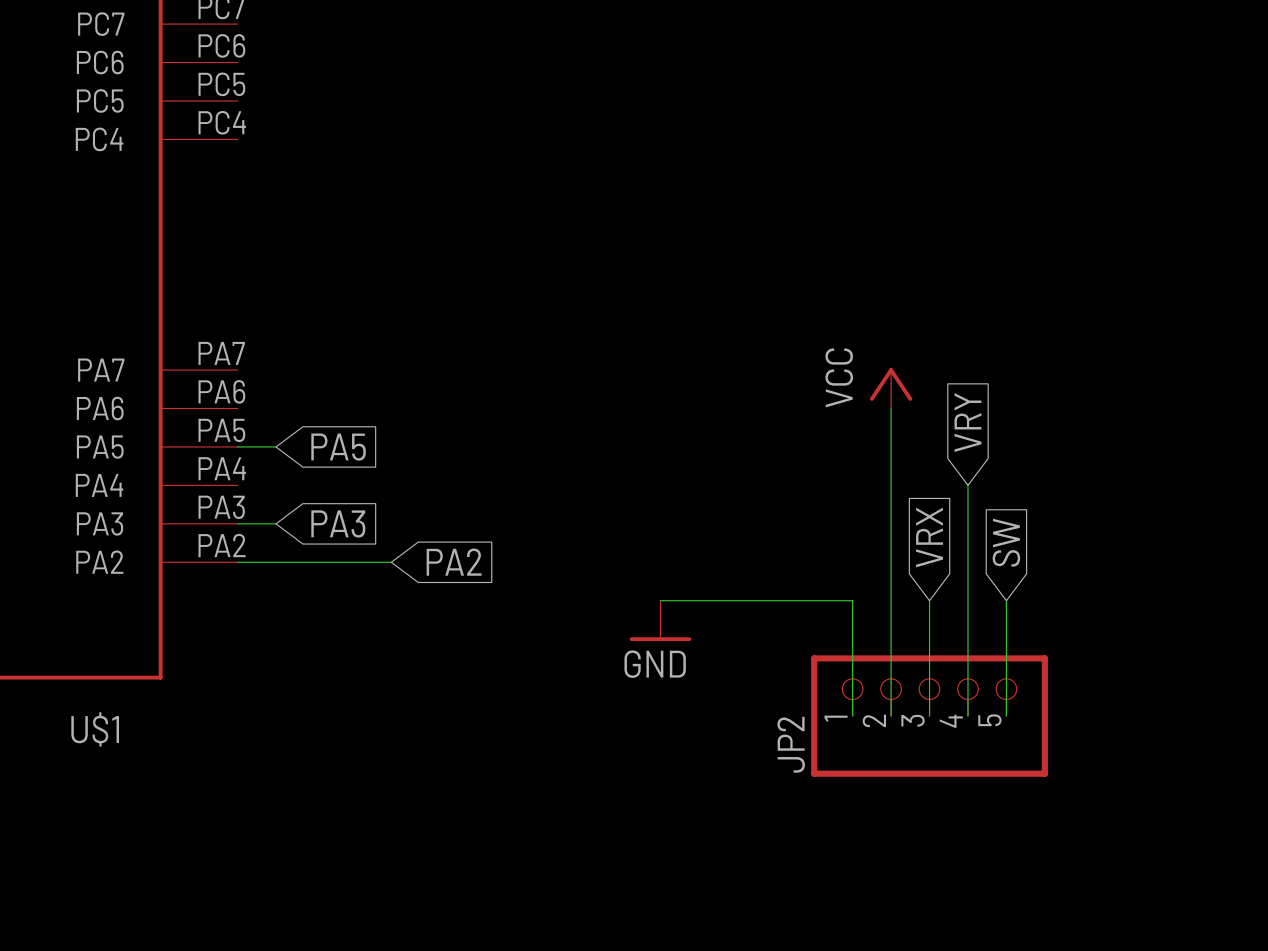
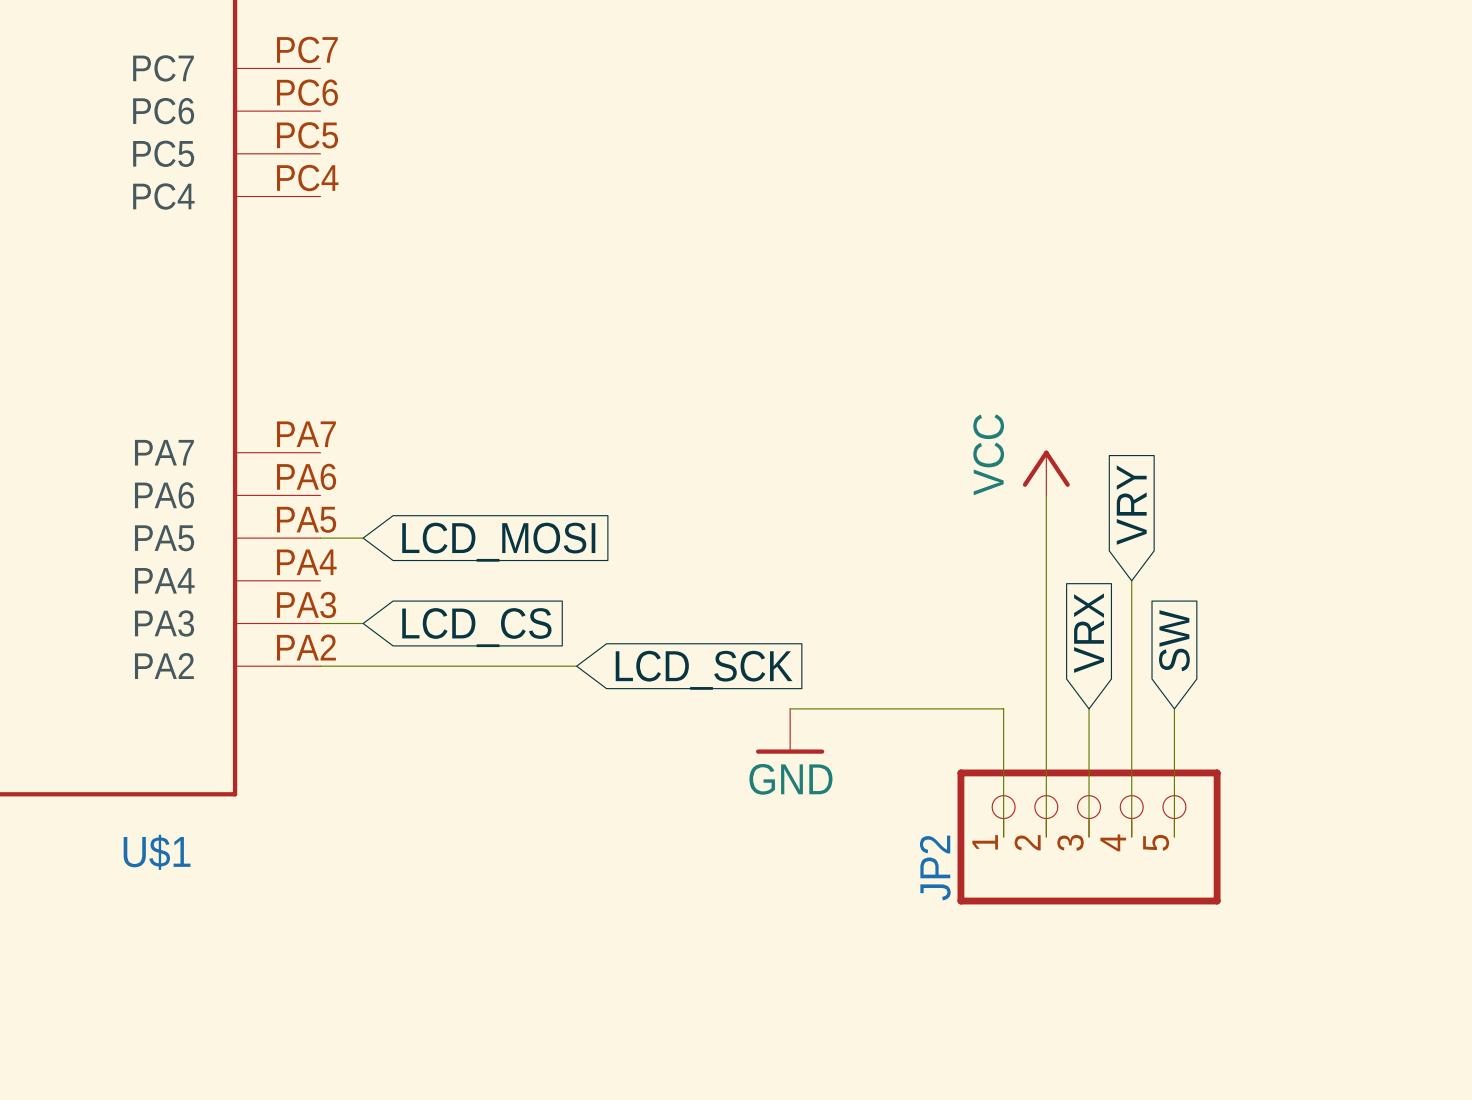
global label: PA5 (338, 447) -> LCD_MOSI (498, 542)
global label: PA3 (338, 523) -> LCD_CS (476, 627)
wire: none -> (491, 666) (576, 666)
global label: PA2 (454, 562) -> none
global label: none -> LCD_SCK (704, 670)

